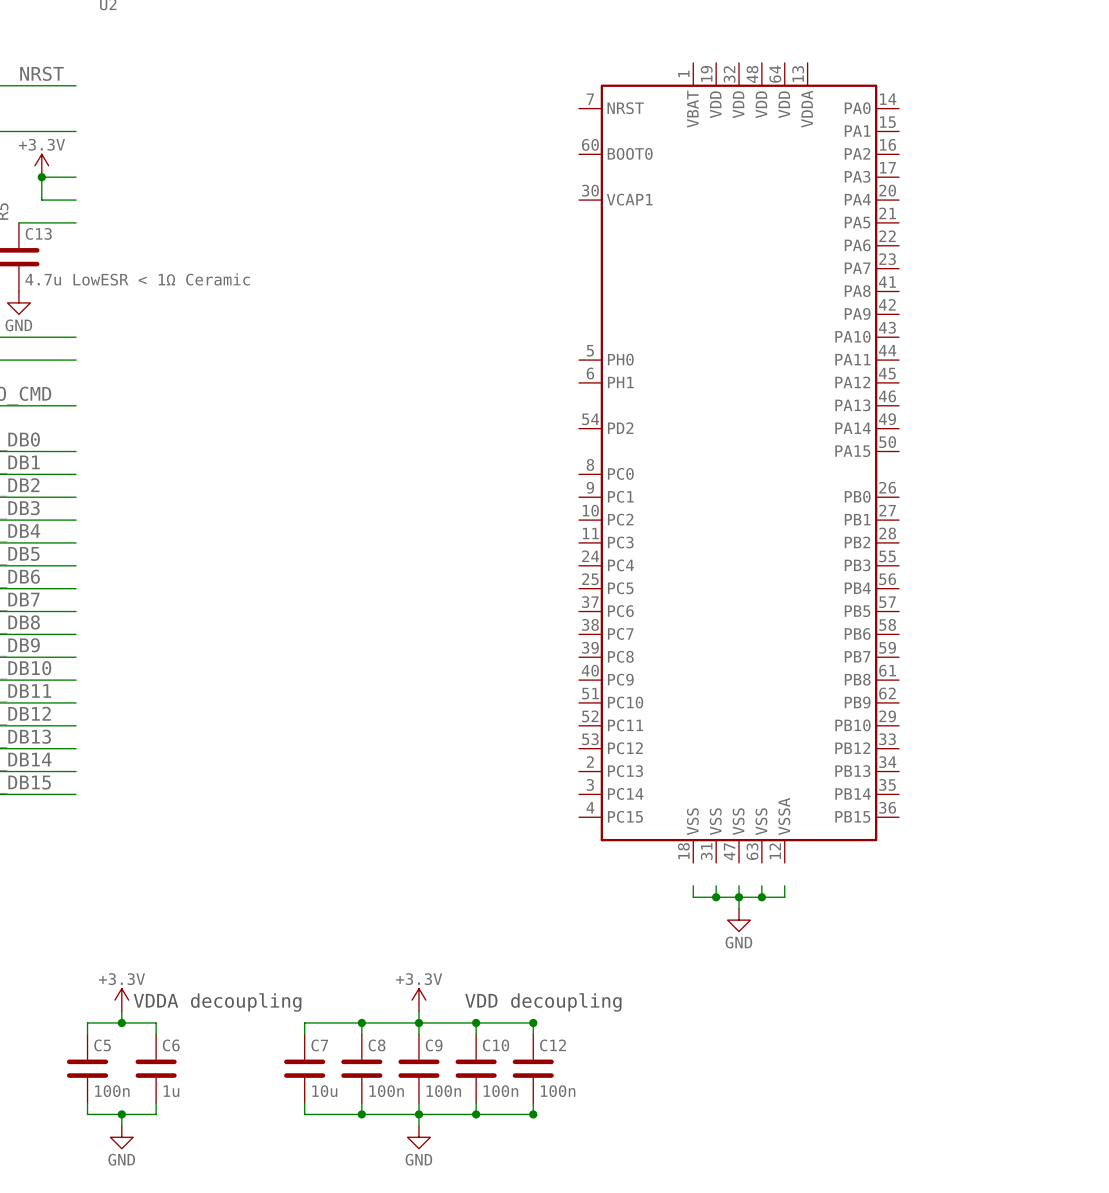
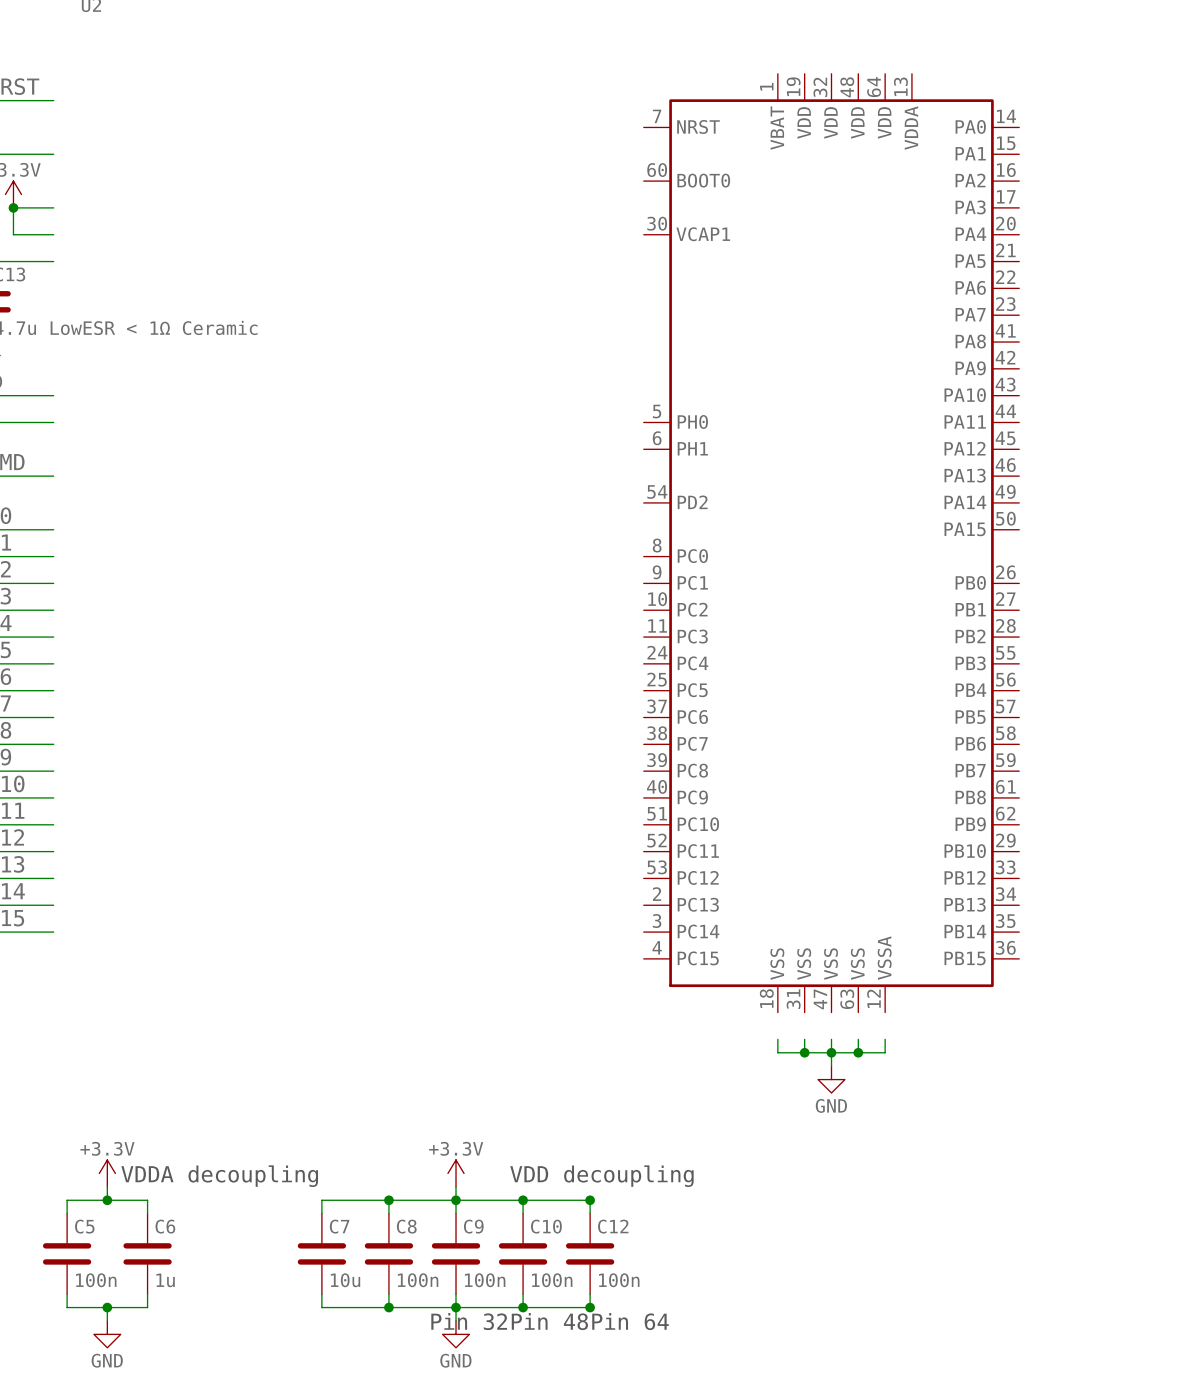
text: none -> Pin 32 (469, 1321)
text: none -> Pin 48 (549, 1321)
text: none -> Pin 64 (630, 1321)

